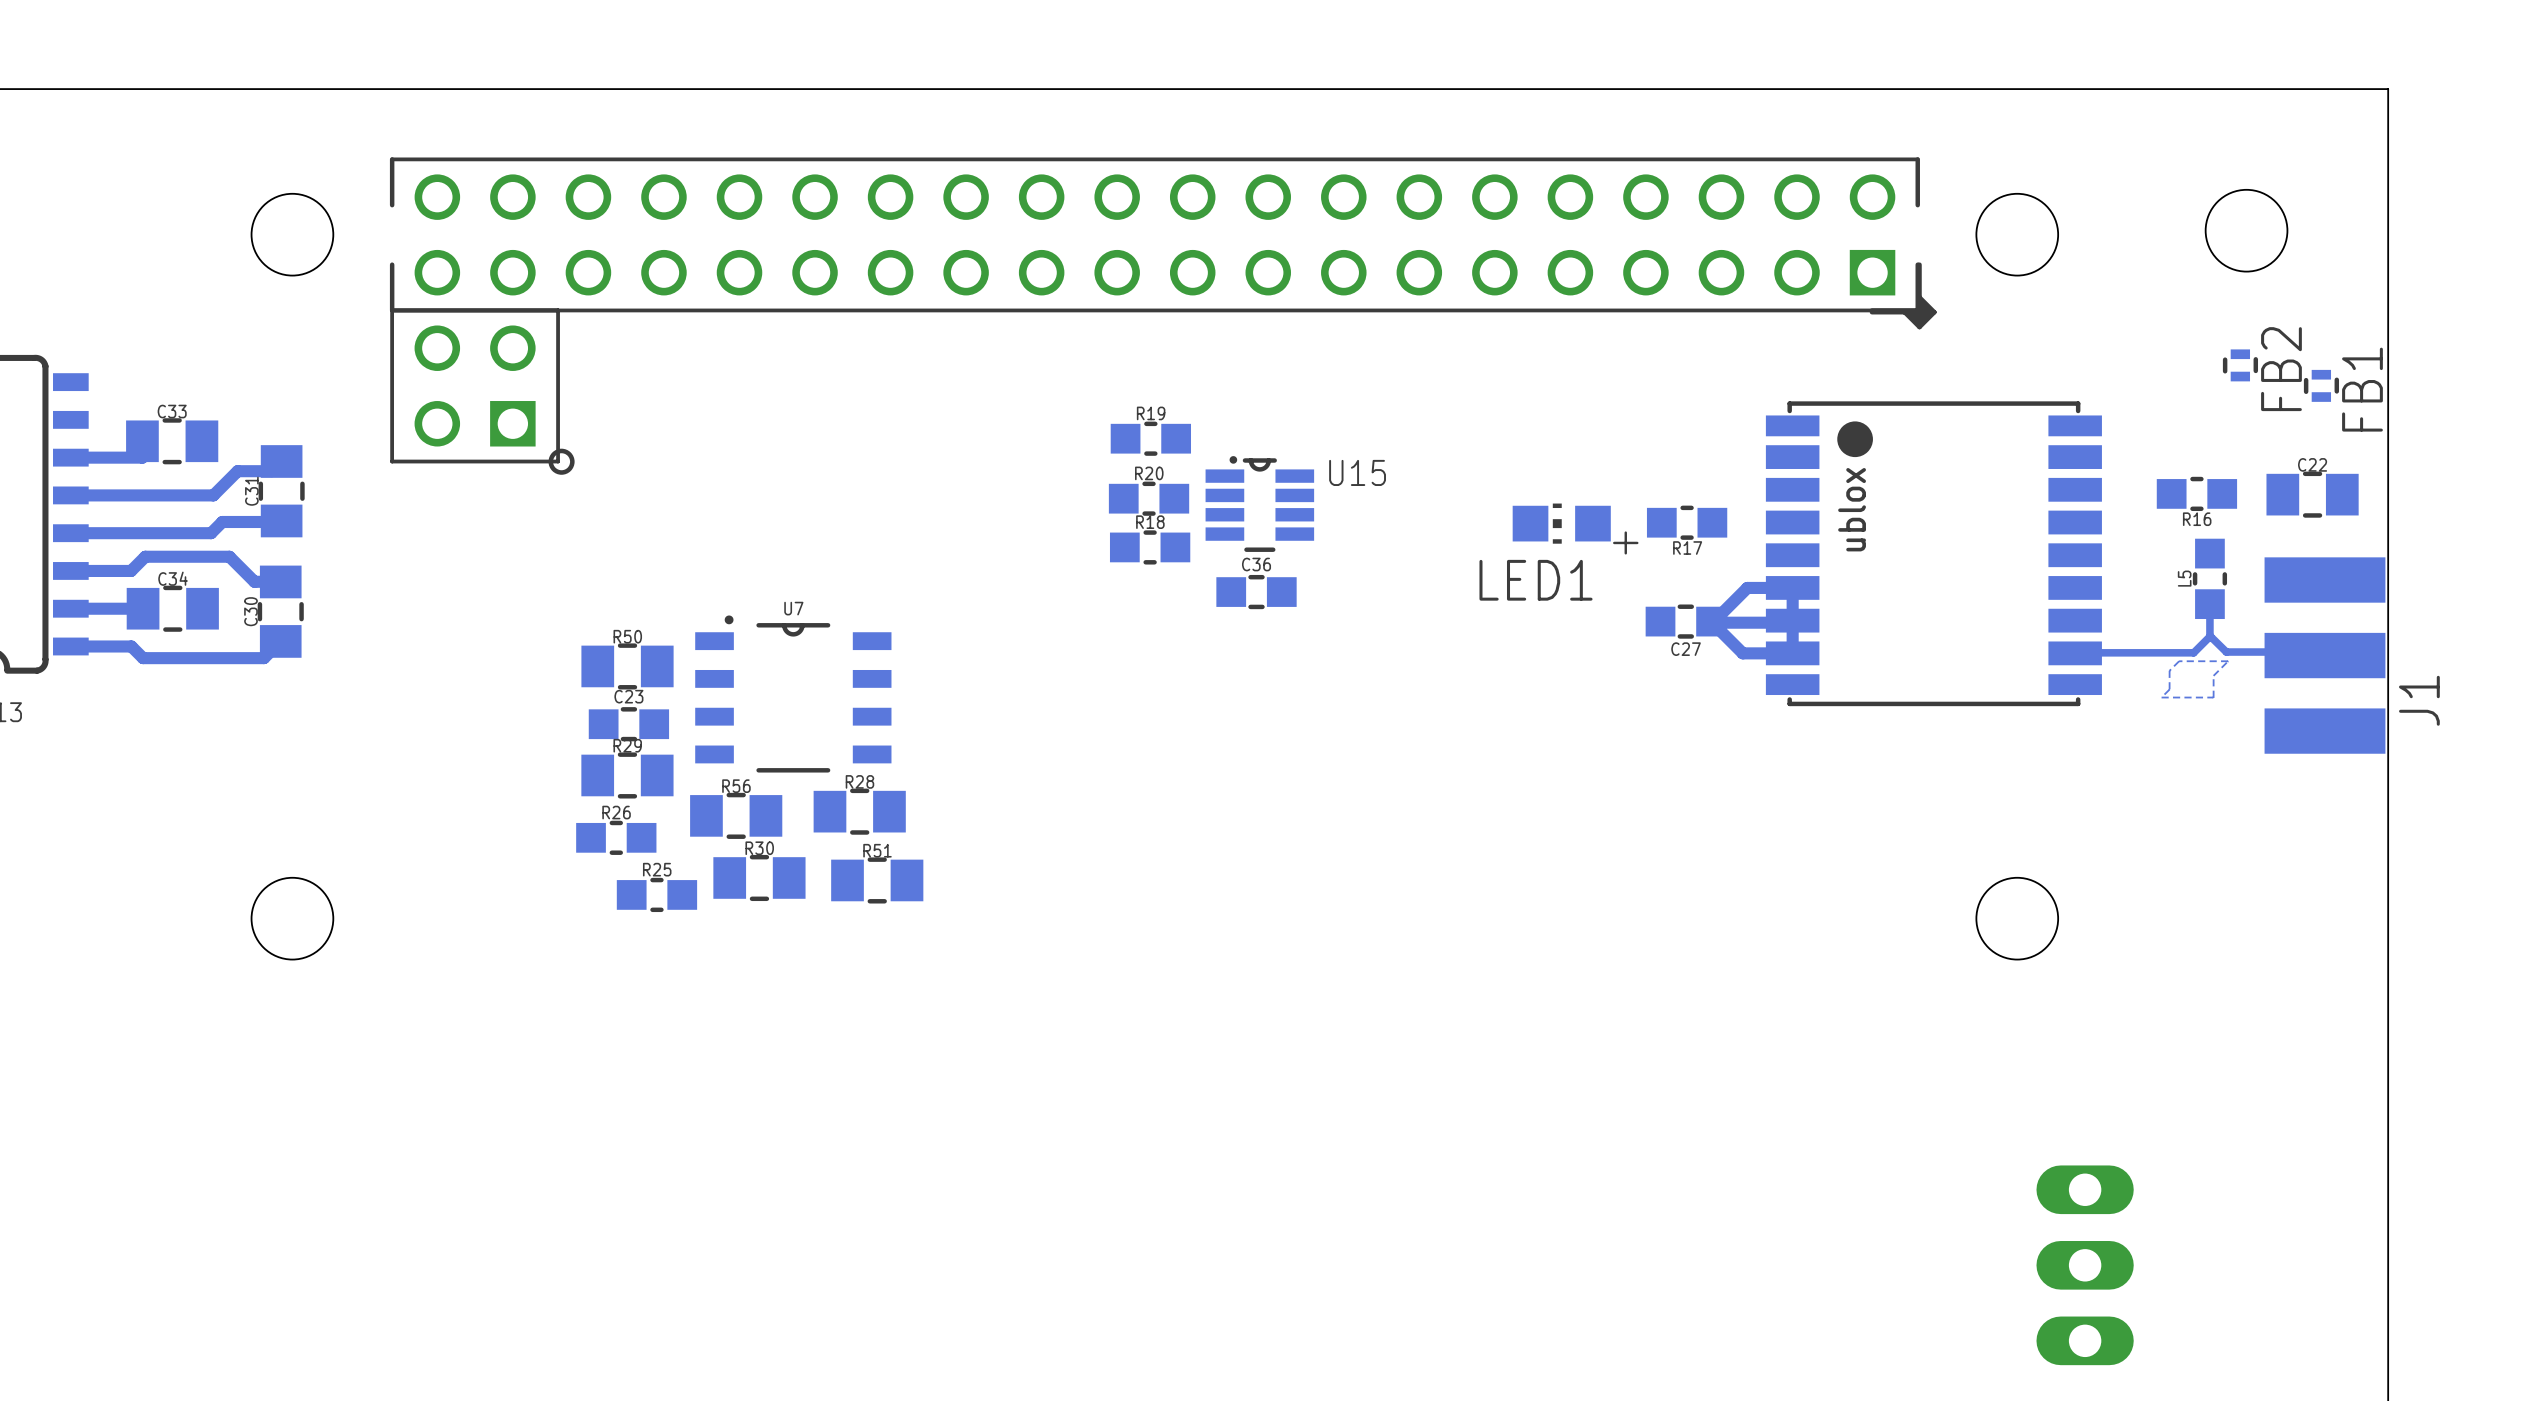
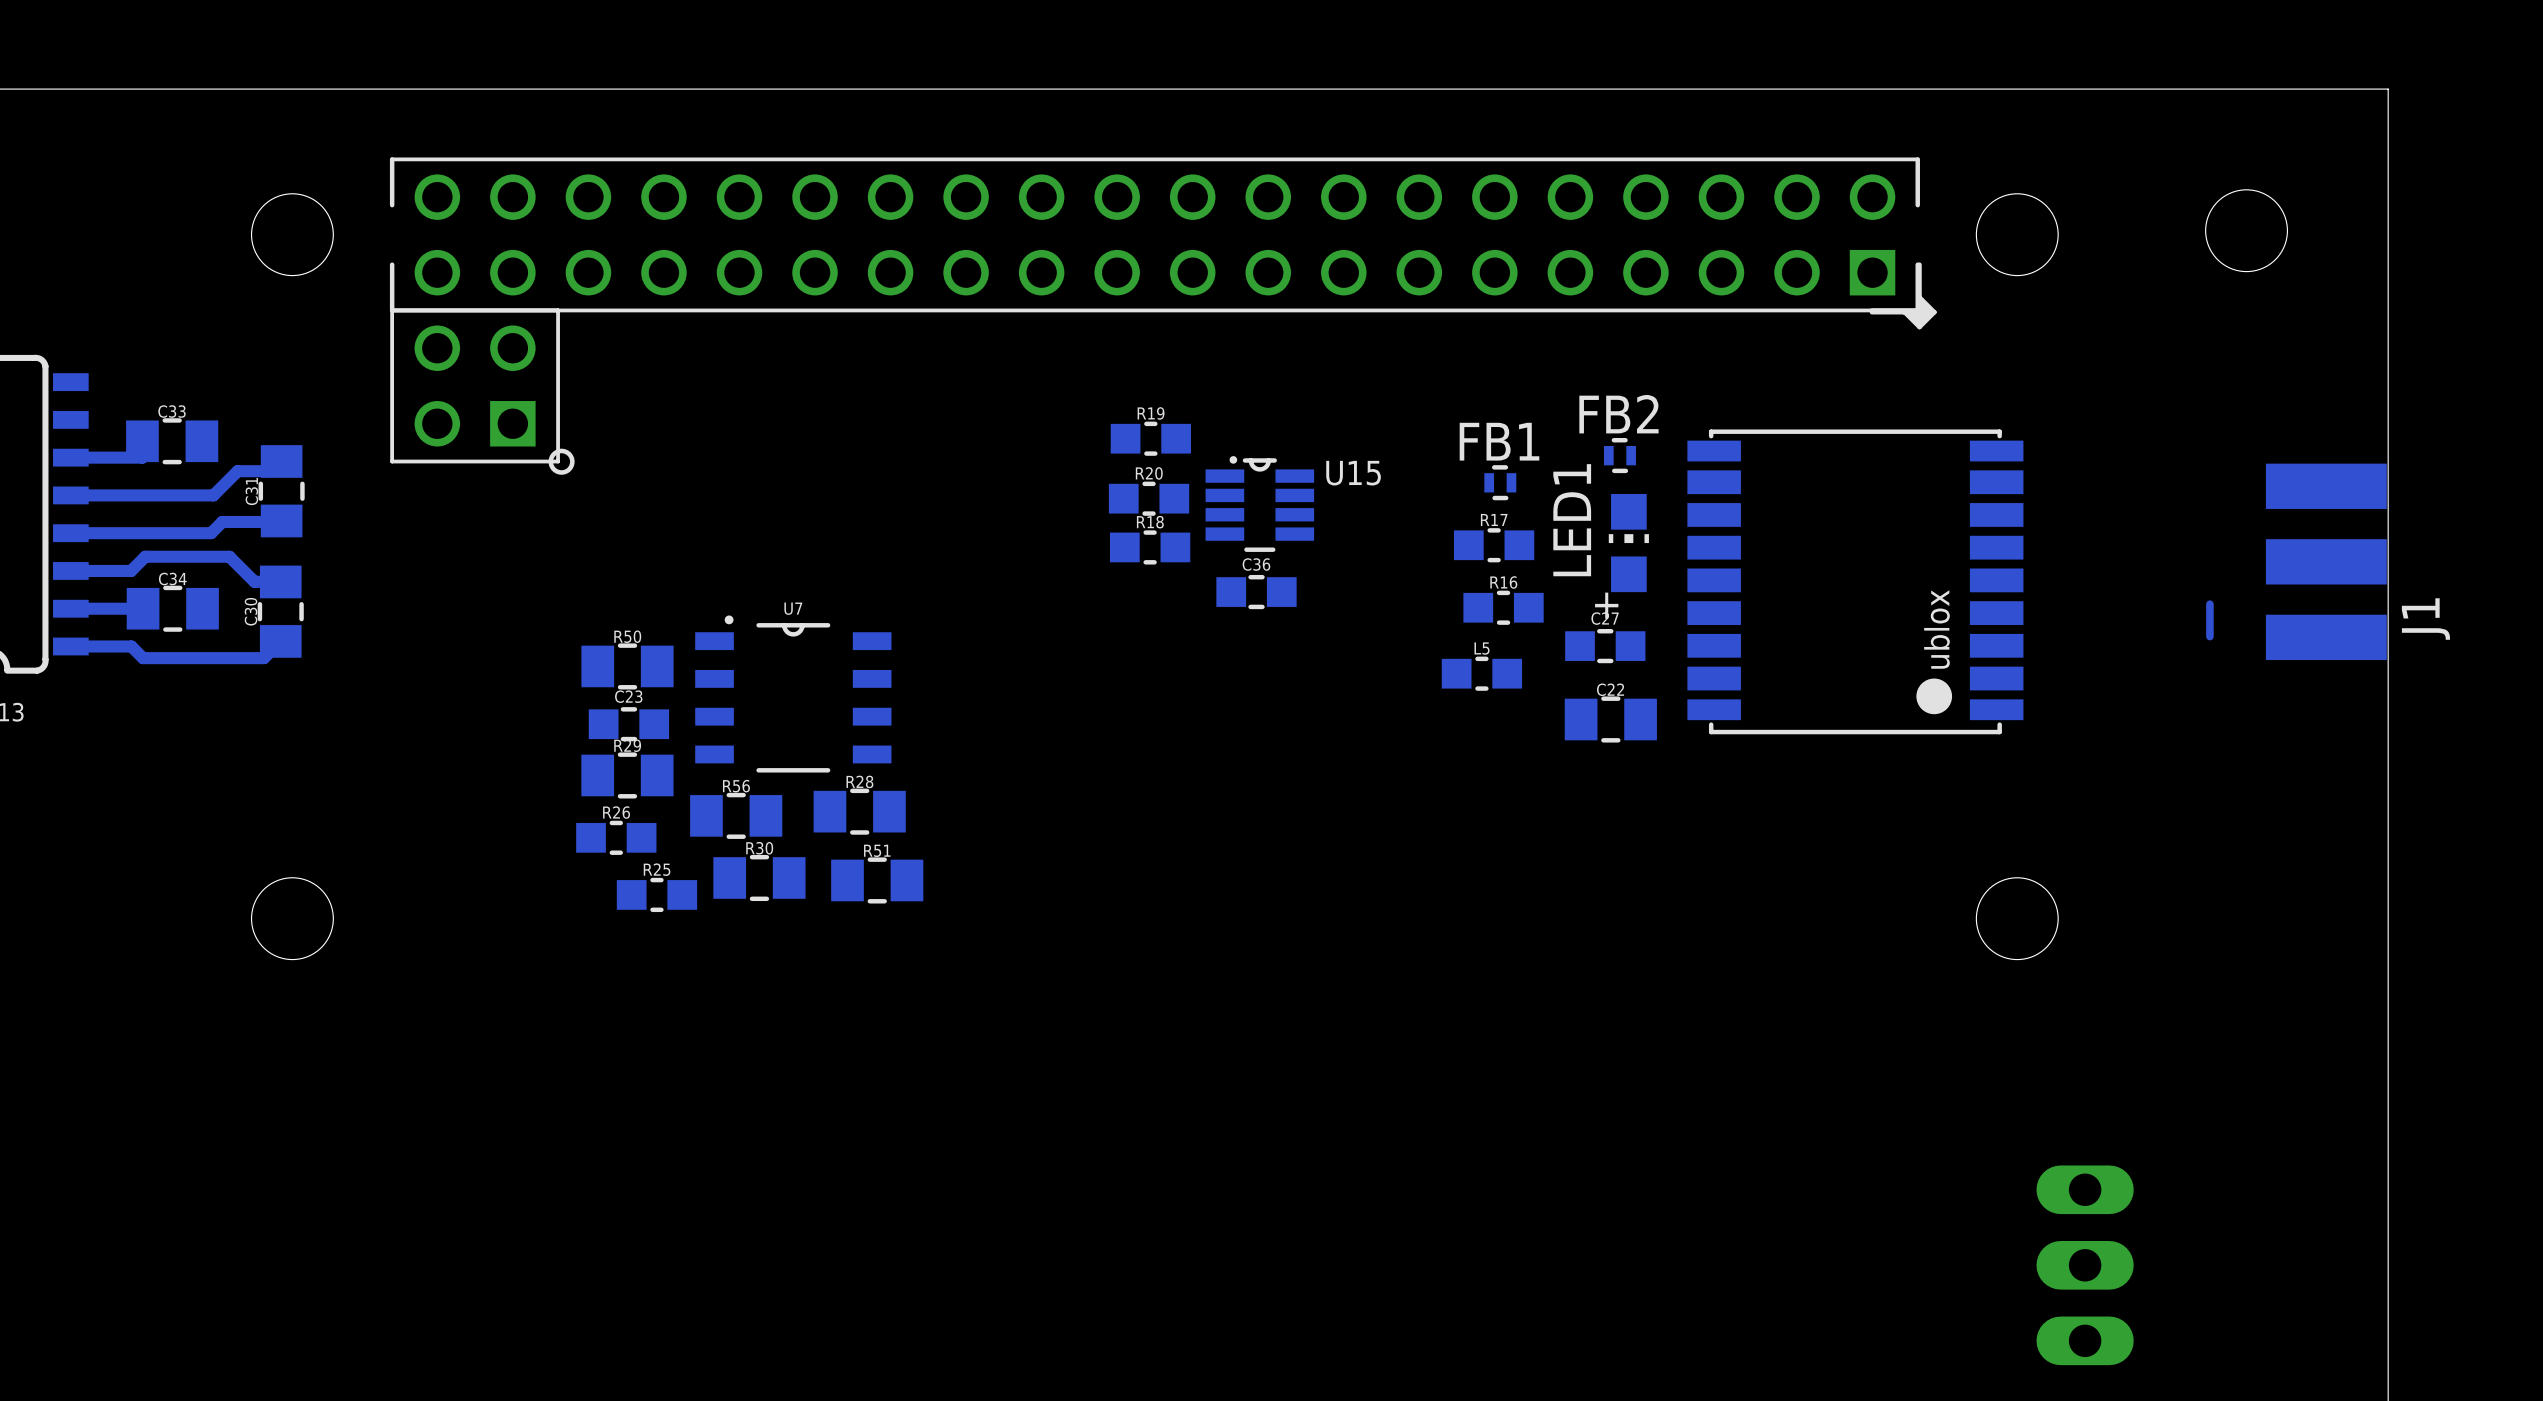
FB2 rotation: 0° (2240, 365) -> 90° clockwise (1619, 455)
FB2 position: (2240, 365) -> (1619, 455)
FB1 rotation: 0° (2321, 385) -> 90° clockwise (1500, 482)
FB1 position: (2321, 385) -> (1500, 482)
R16 position: (2196, 493) -> (1503, 607)
C22 position: (2312, 494) -> (1610, 719)
R16 name position: R16 (2197, 519) -> R16 (1503, 582)
R17 position: (1687, 522) -> (1494, 545)
LED1 rotation: 0° (1561, 523) -> 90° clockwise (1628, 543)
LED1 position: (1561, 523) -> (1628, 543)
R17 name position: R17 (1687, 548) -> R17 (1494, 519)
part: (1933, 553) -> none
L5 rotation: 0° (2209, 578) -> 90° clockwise (1481, 673)
L5 position: (2209, 578) -> (1481, 673)
part: none -> (1855, 581)
C27 position: (1685, 621) -> (1605, 646)
track: (1711, 621) (1742, 653) (1792, 653) (1792, 587) (1747, 587) (1712, 622) (1792, 622) -> none
C27 name position: C27 (1686, 649) -> C27 (1605, 618)
track: (2075, 653) (2193, 652) (2210, 636) (2226, 652) (2322, 652) (2324, 655) (2323, 654) -> none
J1 position: (2324, 655) -> (2326, 561)
zone outline: (2213, 697) (2161, 697) (2169, 689) (2169, 670) (2179, 661) (2228, 661) (2213, 675) (2213, 697) -> none

